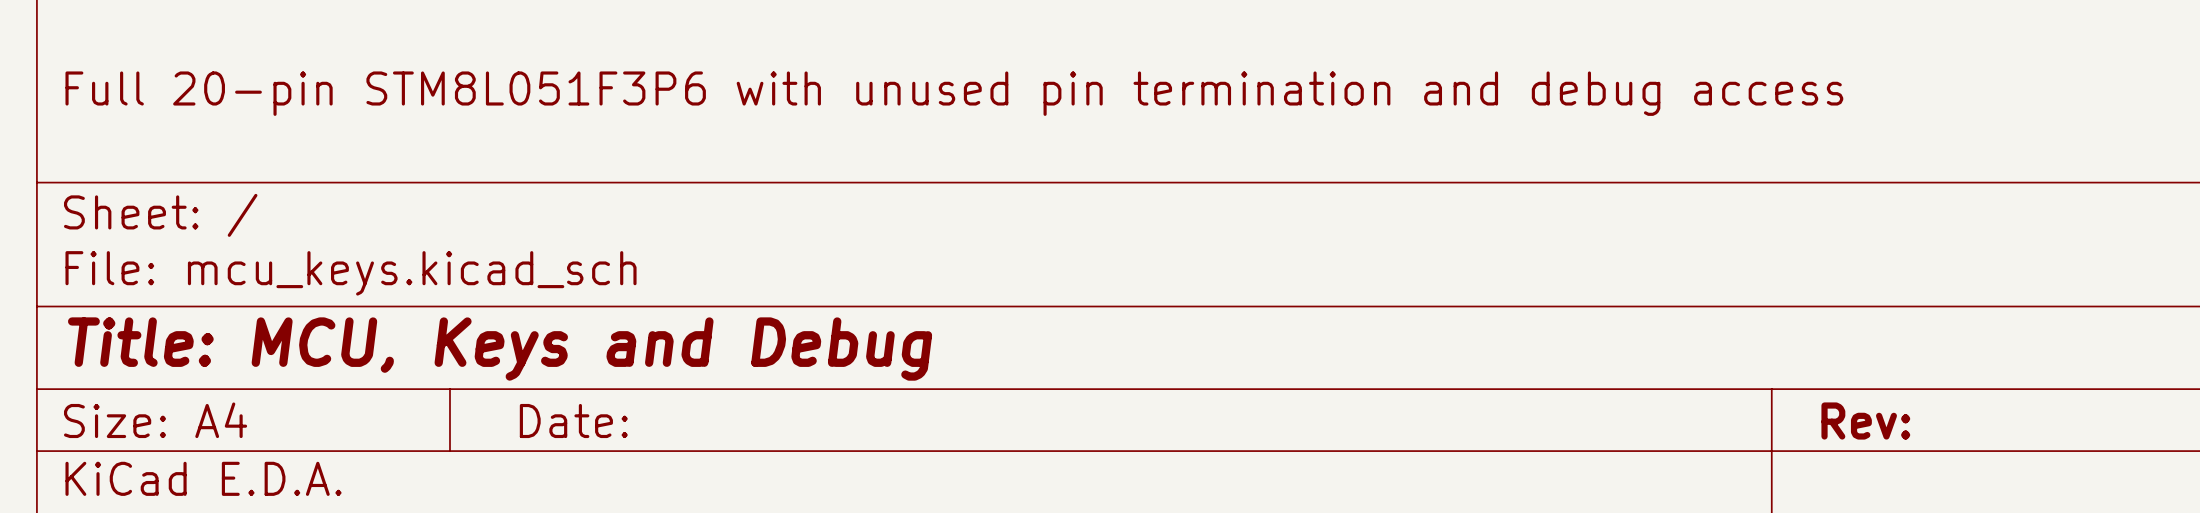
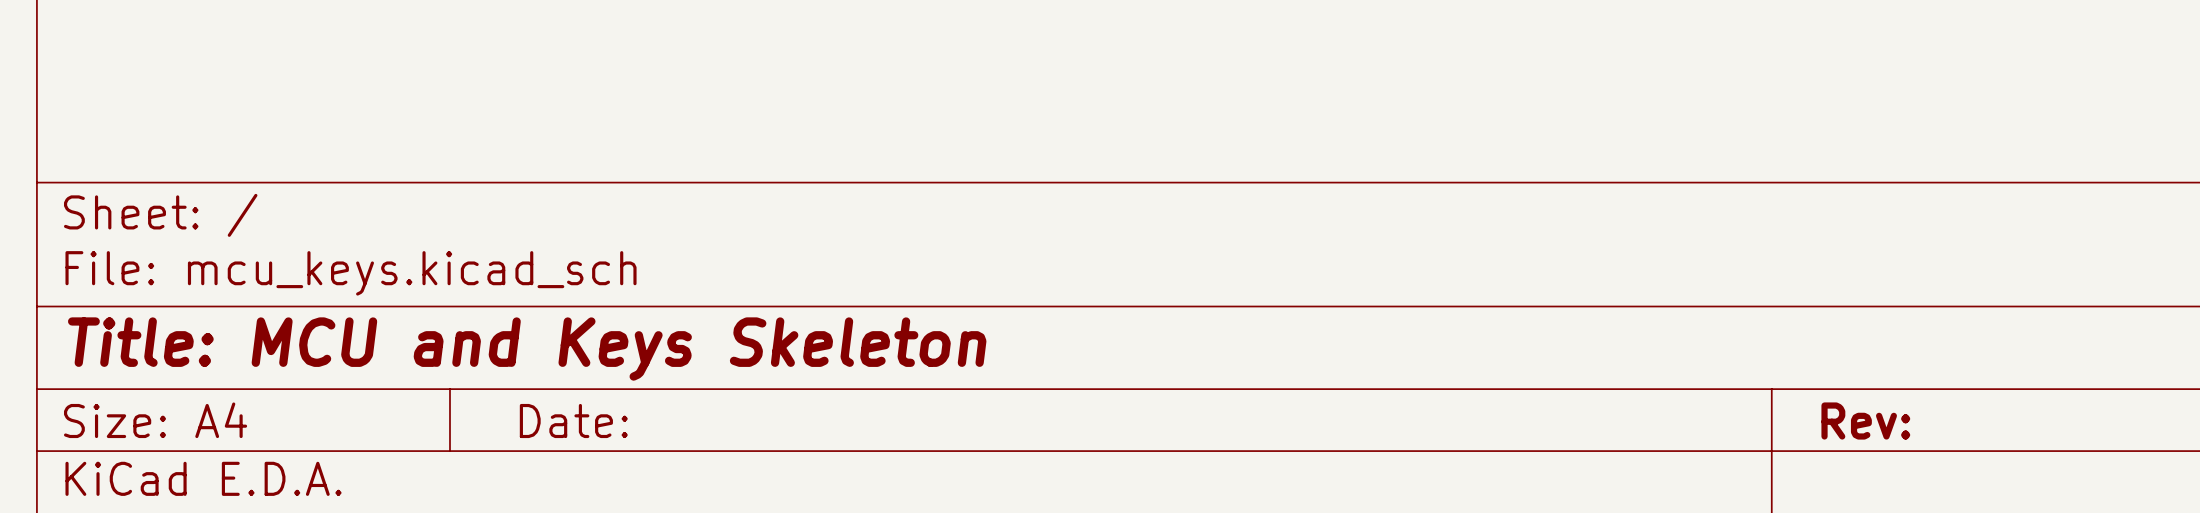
title block: Full 20-pin STM8L051F3P6 with unused pin termination and debug access (954, 93) -> none
title block: Title: MCU, Keys and Debug (500, 349) -> Title: MCU and Keys Skeleton (527, 349)

